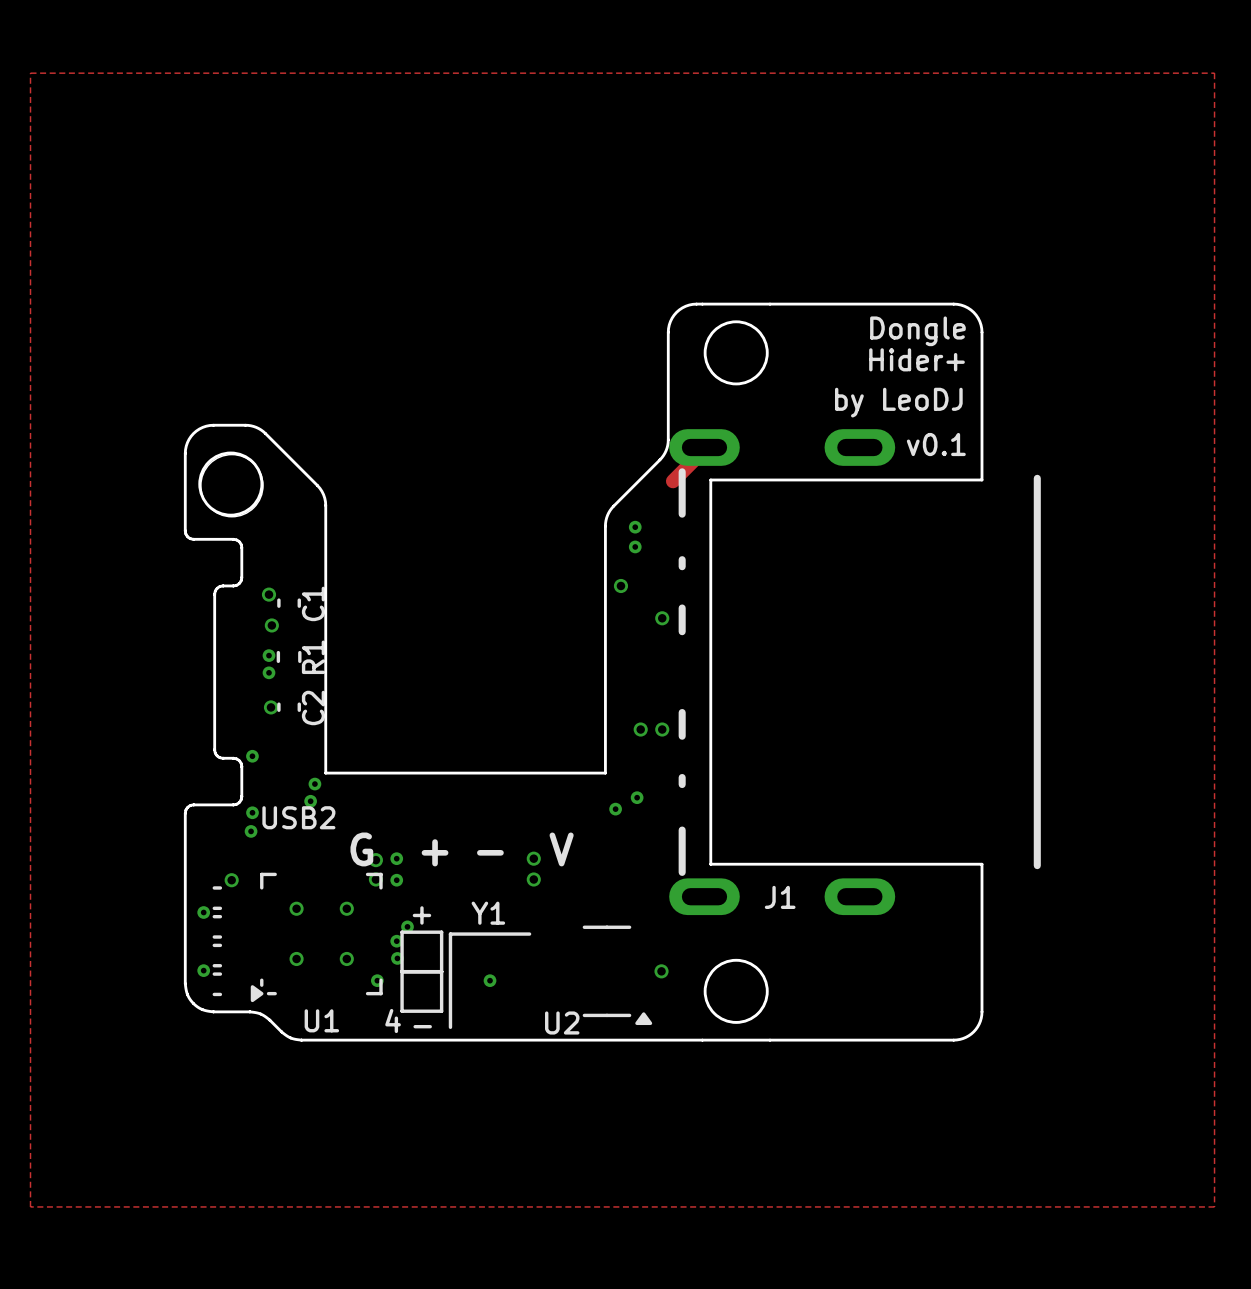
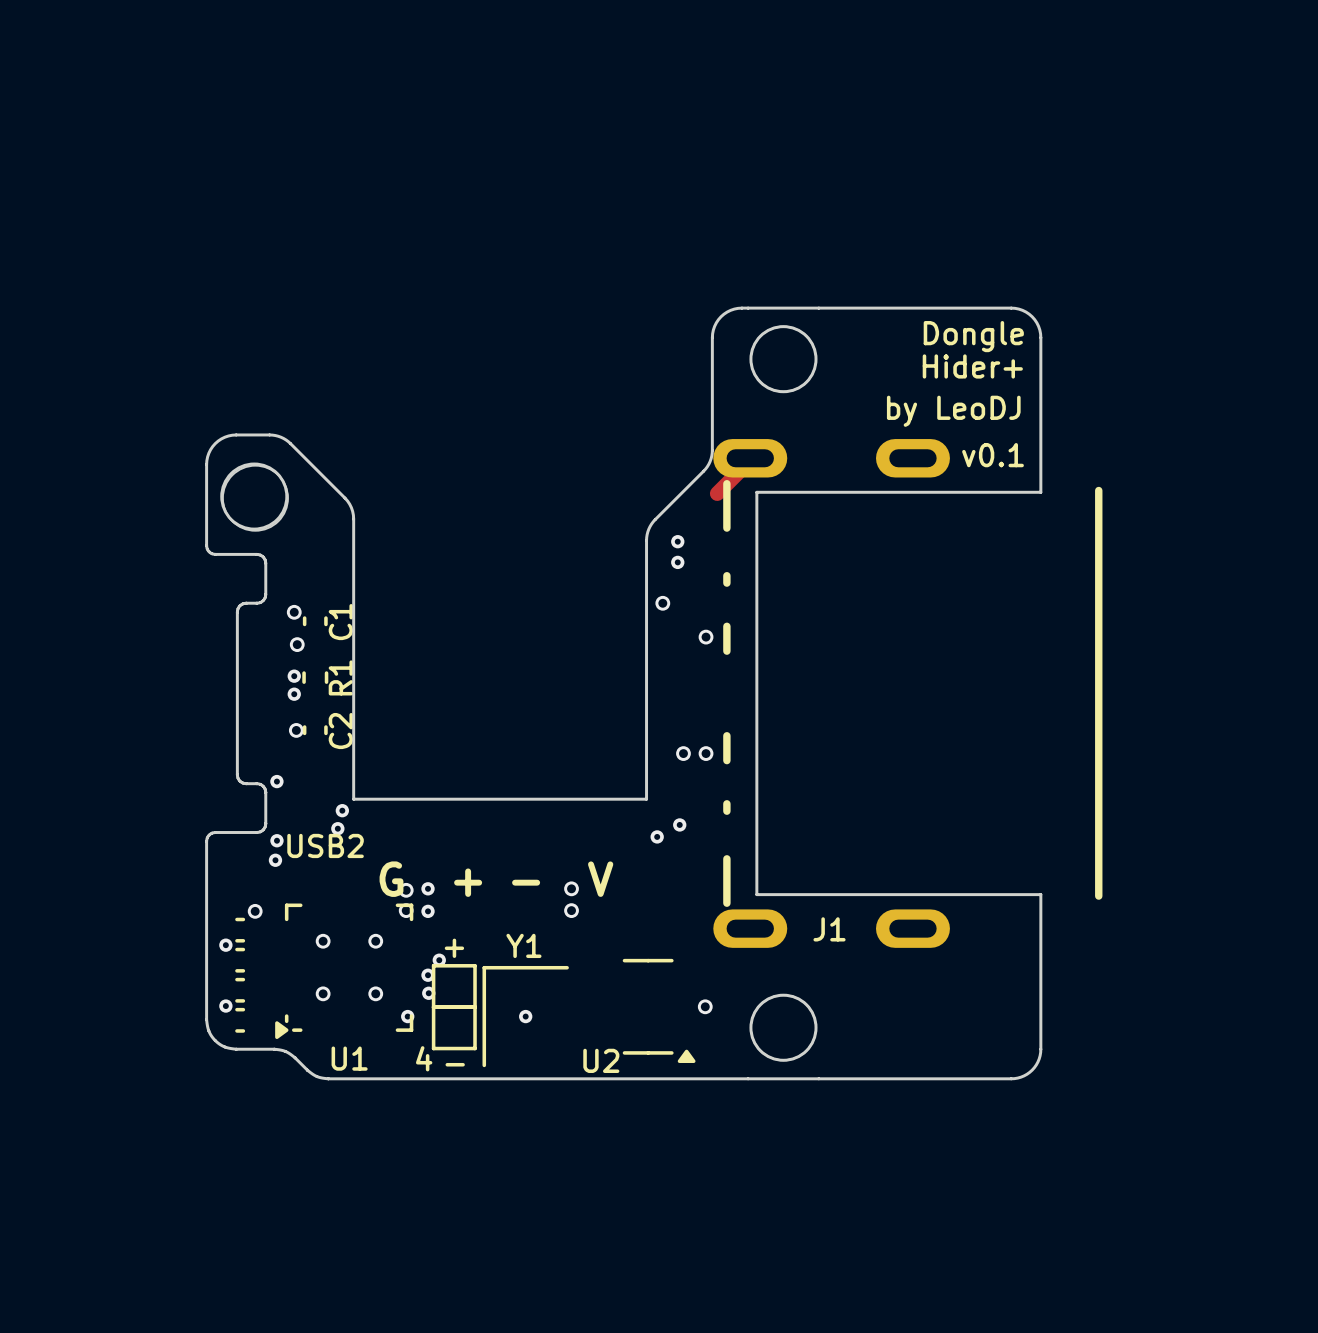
zone outline: (30, 73) (1214, 73) (1214, 1206) (30, 1206) (30, 73) -> none

